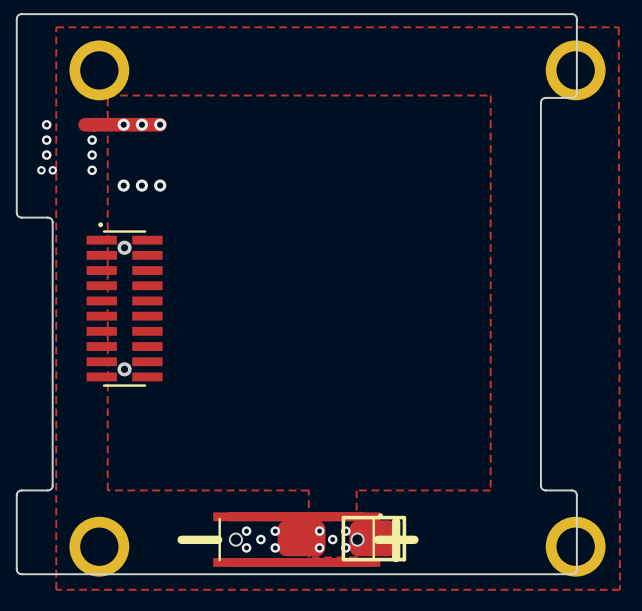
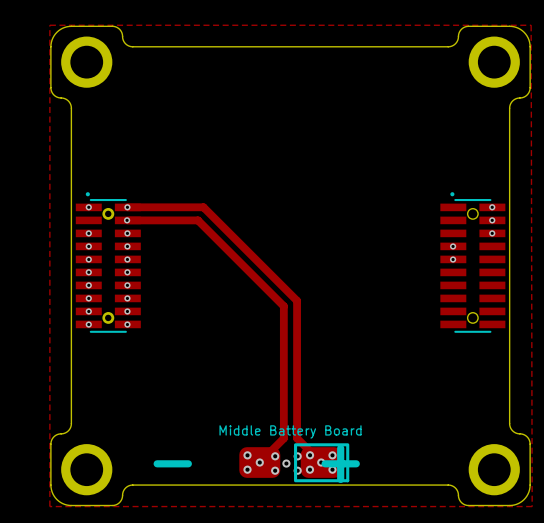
board edge: (21, 14) (575, 15) (576, 94) (572, 97) (544, 98) (540, 102) (540, 486) (544, 490) (572, 490) (576, 493) (575, 572) (18, 572) (17, 493) (20, 490) (49, 490) (52, 485) (52, 221) (48, 217) (20, 217) (16, 213) (16, 18) (21, 14) -> (71, 26) (62, 28) (56, 32) (52, 40) (50, 46) (51, 91) (55, 96) (67, 100) (71, 108) (71, 423) (68, 430) (55, 435) (51, 441) (51, 487) (56, 499) (69, 505) (114, 505) (121, 500) (125, 488) (132, 485) (448, 485) (455, 488) (460, 500) (466, 505) (511, 505) (524, 499) (529, 487) (529, 441) (525, 435) (512, 430) (509, 423) (509, 108) (512, 100) (525, 96) (529, 90) (529, 44) (524, 32) (511, 26) (466, 26) (460, 31) (455, 43) (448, 46) (132, 46) (124, 42) (121, 31) (115, 26) (71, 26)
zone outline: (107, 95) (107, 490) (308, 490) (308, 557) (356, 557) (356, 490) (490, 490) (490, 95) (107, 95) -> none
via: (46, 124) -> none
track: (85, 124) (160, 124) -> none
via: (123, 124) -> none
via: (141, 124) -> none
via: (160, 124) -> none
via: (46, 140) -> none
via: (92, 140) -> none
via: (46, 155) -> none
via: (92, 155) -> none
via: (41, 170) -> none
via: (52, 170) -> none
via: (92, 170) -> none
via: (123, 185) -> none
via: (141, 185) -> none
via: (160, 185) -> none
via: none -> (88, 207)
track: none -> (127, 207) (203, 207) (297, 300) (297, 438) (321, 462)
via: none -> (127, 207)
via: none -> (492, 207)
via: none -> (127, 220)
track: none -> (127, 220) (198, 220) (283, 306) (283, 438) (259, 462)
via: none -> (492, 220)
via: none -> (88, 233)
via: none -> (127, 233)
via: none -> (492, 233)
via: none -> (88, 246)
via: none -> (127, 246)
via: none -> (453, 246)
via: none -> (88, 259)
via: none -> (127, 259)
via: none -> (453, 259)
part: none -> (472, 262)
via: none -> (88, 272)
via: none -> (127, 272)
via: none -> (88, 285)
via: none -> (127, 285)
via: none -> (88, 298)
via: none -> (127, 298)
via: none -> (88, 311)
via: none -> (127, 311)
via: none -> (88, 324)
via: none -> (127, 324)
text: none -> Middle Battery Board (290, 431)
via: none -> (247, 455)
via: none -> (310, 455)
via: none -> (332, 455)
via: (246, 531) -> none
via: (275, 531) -> none
via: none -> (259, 462)
via: none -> (321, 462)
via: (260, 539) -> none
part: (298, 539) -> none
via: none -> (247, 469)
via: none -> (309, 469)
via: none -> (332, 469)
via: (246, 547) -> none
via: (275, 547) -> none

